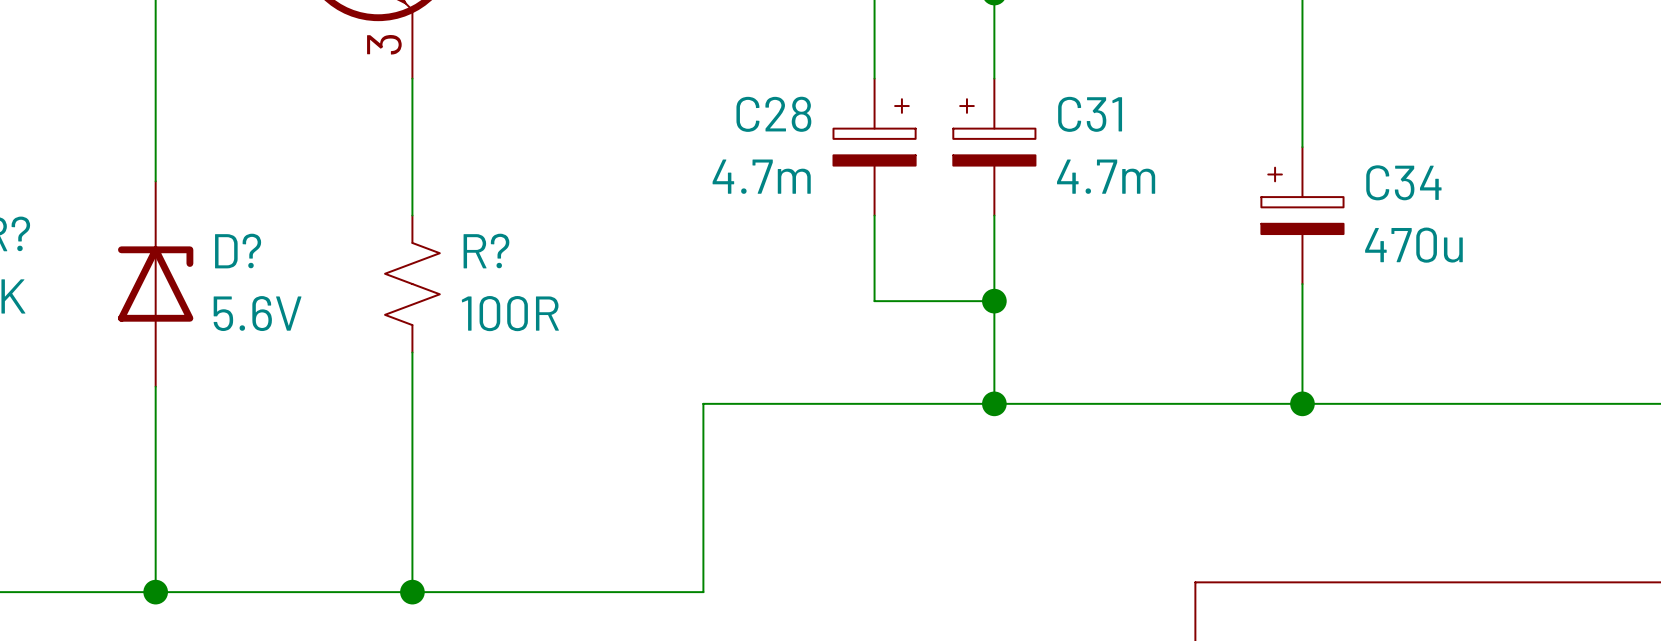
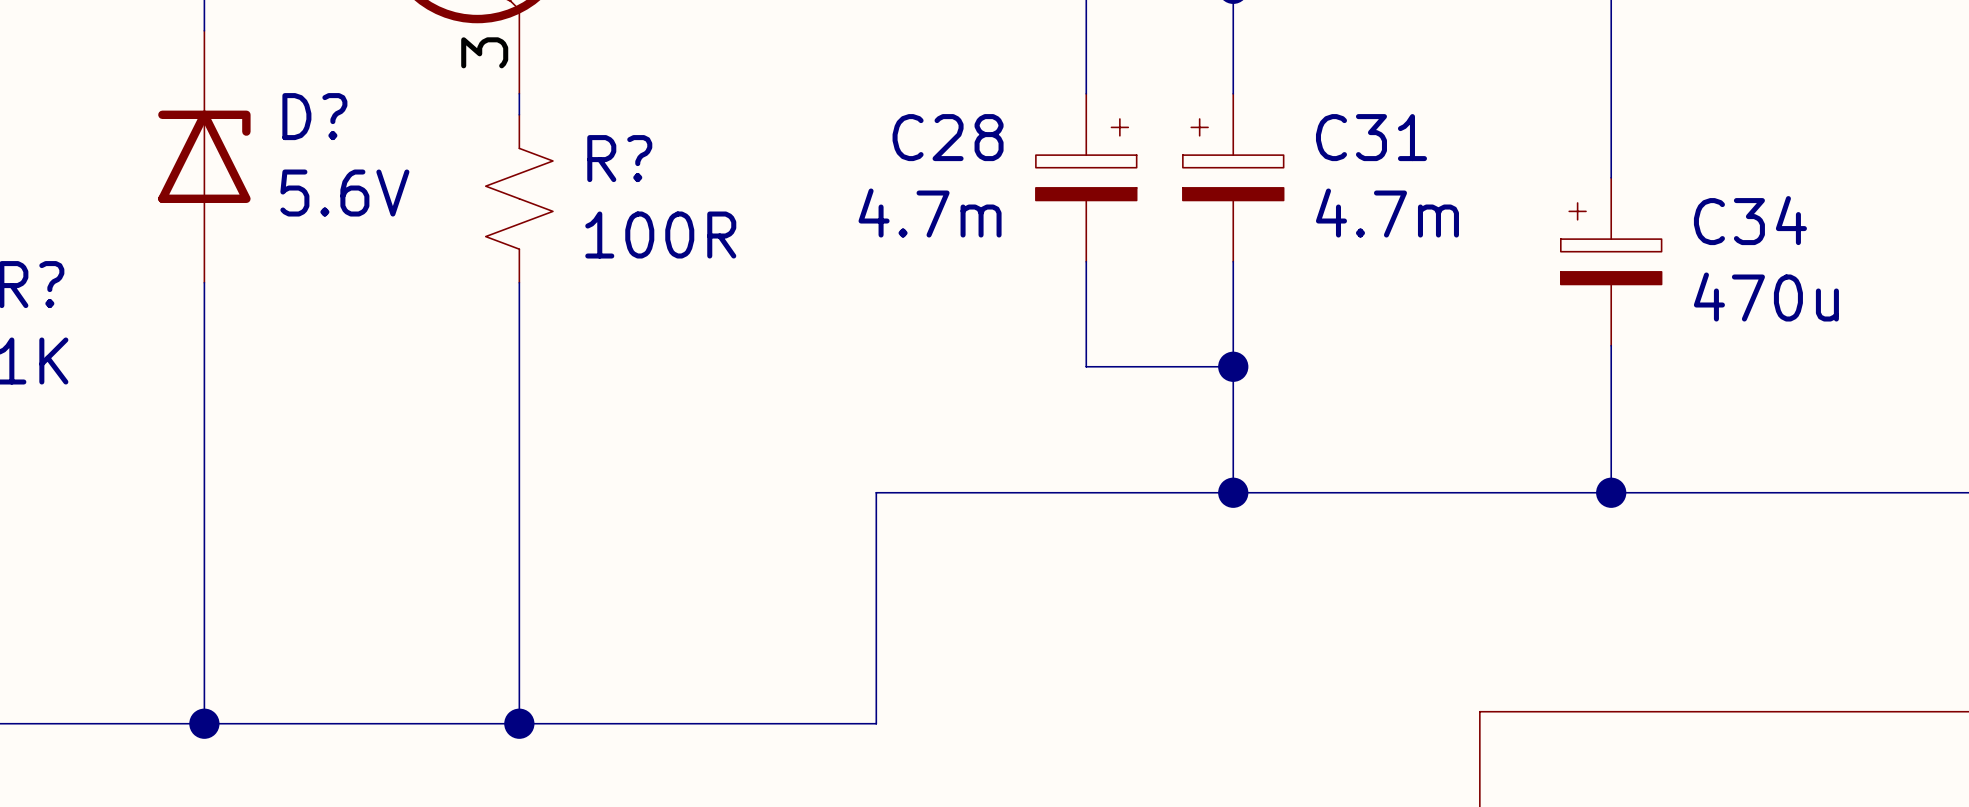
wire: (412, 95) (412, 215) -> (519, 282) (519, 429)
D? position: (155, 284) -> (204, 156)
R? position: (412, 284) -> (519, 198)

